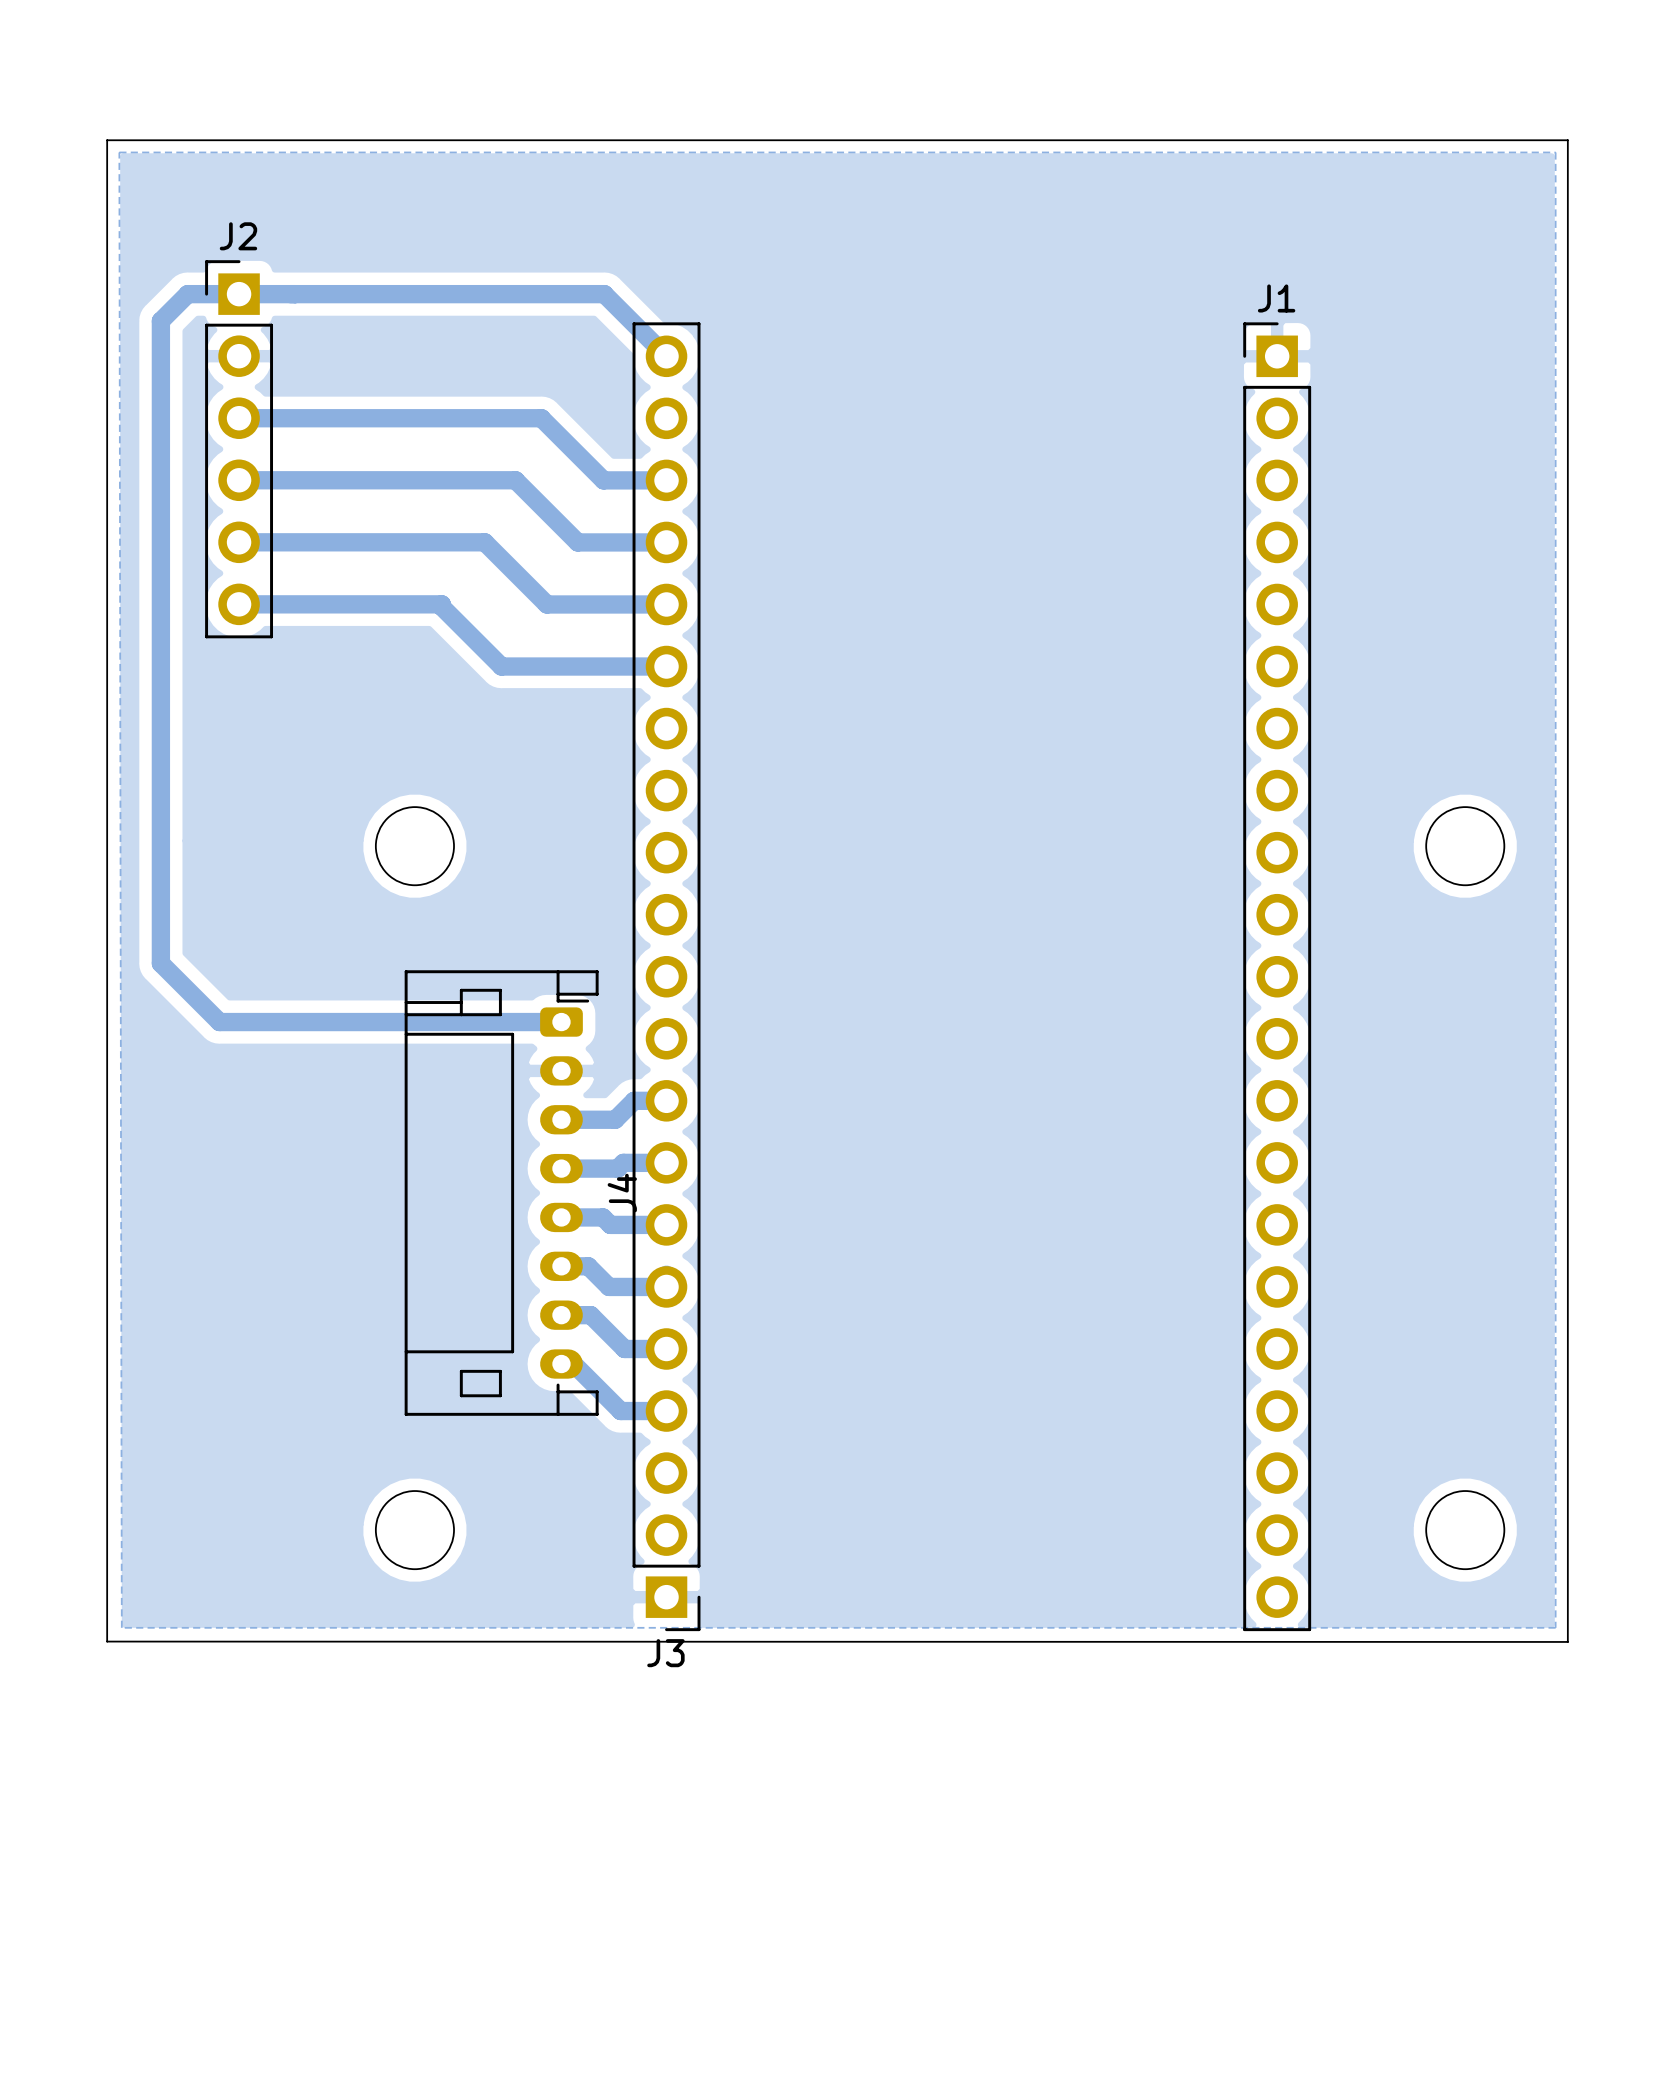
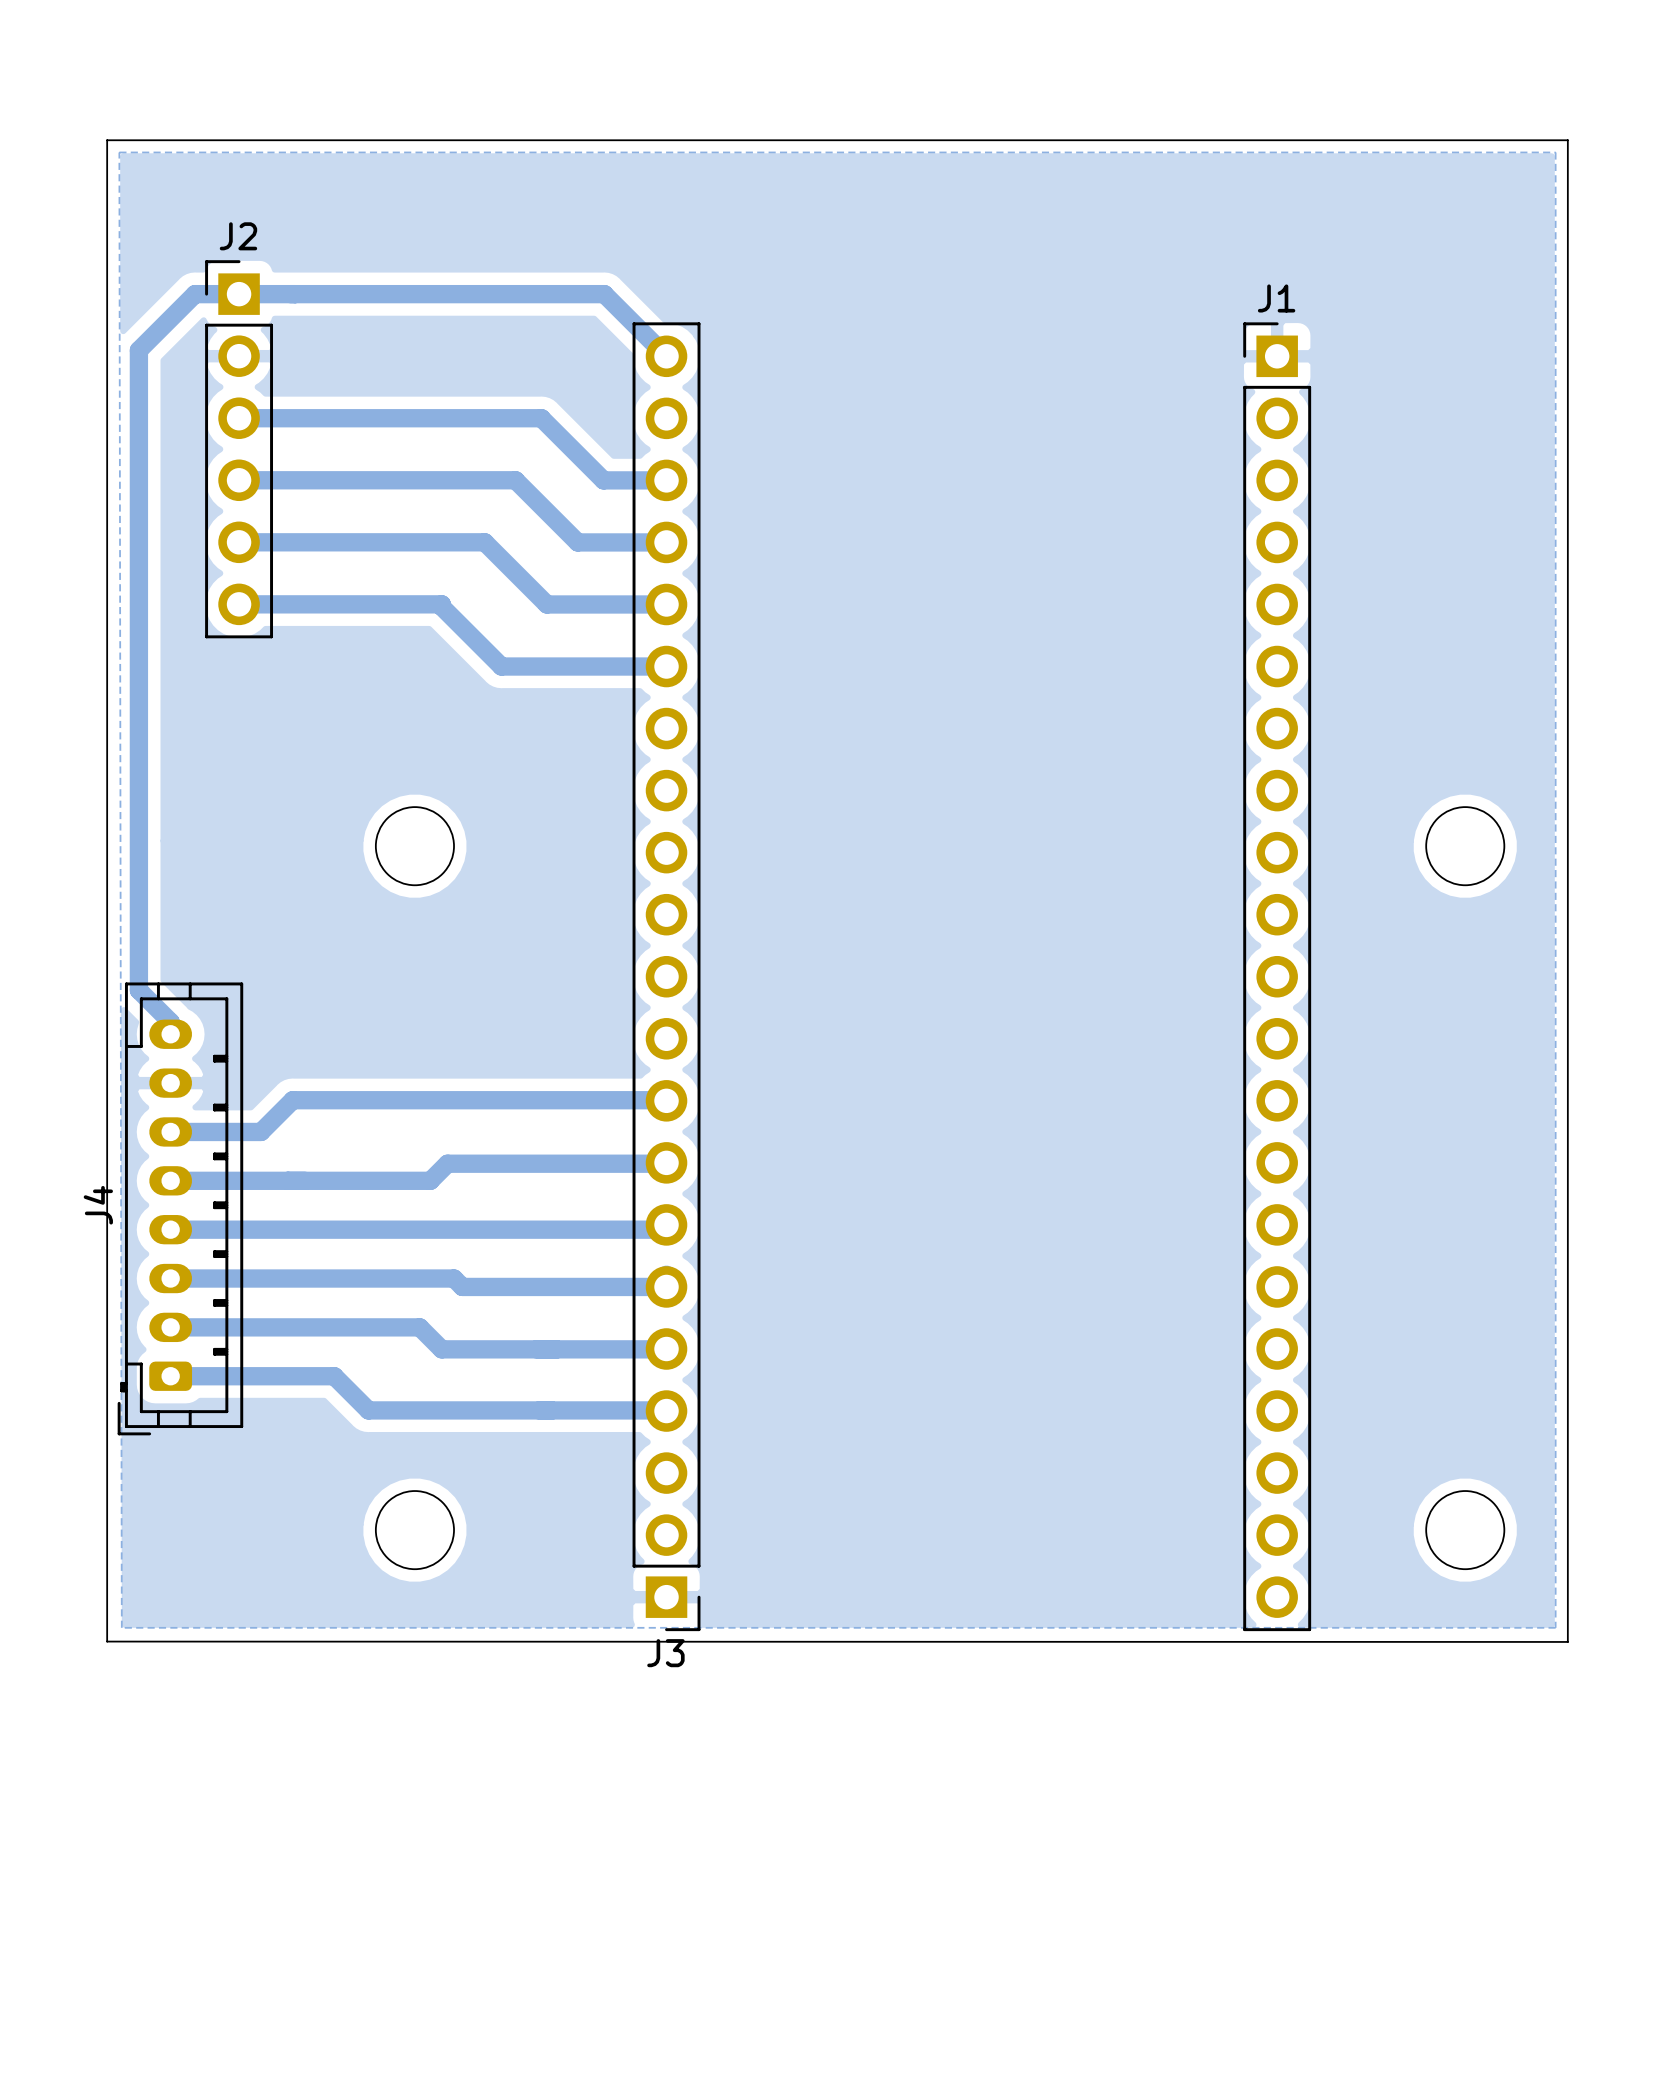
bottom track: (195, 294) (187, 294) (160, 321) (160, 963) (219, 1022) (561, 1022) -> (195, 294) (138, 350) (138, 990) (170, 1022) (170, 1034)
J4 footprint: [404, 970, 599, 1416] -> [117, 982, 244, 1436]
bottom track: (666, 1100) (634, 1100) (615, 1119) (561, 1119) -> (666, 1100) (292, 1100) (261, 1131) (182, 1131)
bottom track: (666, 1162) (623, 1162) (617, 1168) (561, 1168) -> (666, 1163) (447, 1163) (430, 1180) (182, 1180)
J4 name position: J4 (622, 1193) -> J4 (98, 1205)
bottom track: (561, 1217) (603, 1217) (610, 1224) (666, 1224) -> none
bottom track: none -> (182, 1229) (661, 1229)
bottom track: (561, 1266) (588, 1266) (608, 1286) -> (182, 1278) (454, 1278) (462, 1286) (608, 1286)
bottom track: (561, 1315) (590, 1315) (624, 1348) (666, 1348) -> (182, 1327) (419, 1327) (441, 1349) (666, 1349)
bottom track: (561, 1364) (573, 1364) (620, 1411) (666, 1411) -> (182, 1376) (334, 1376) (368, 1410) (665, 1410)

